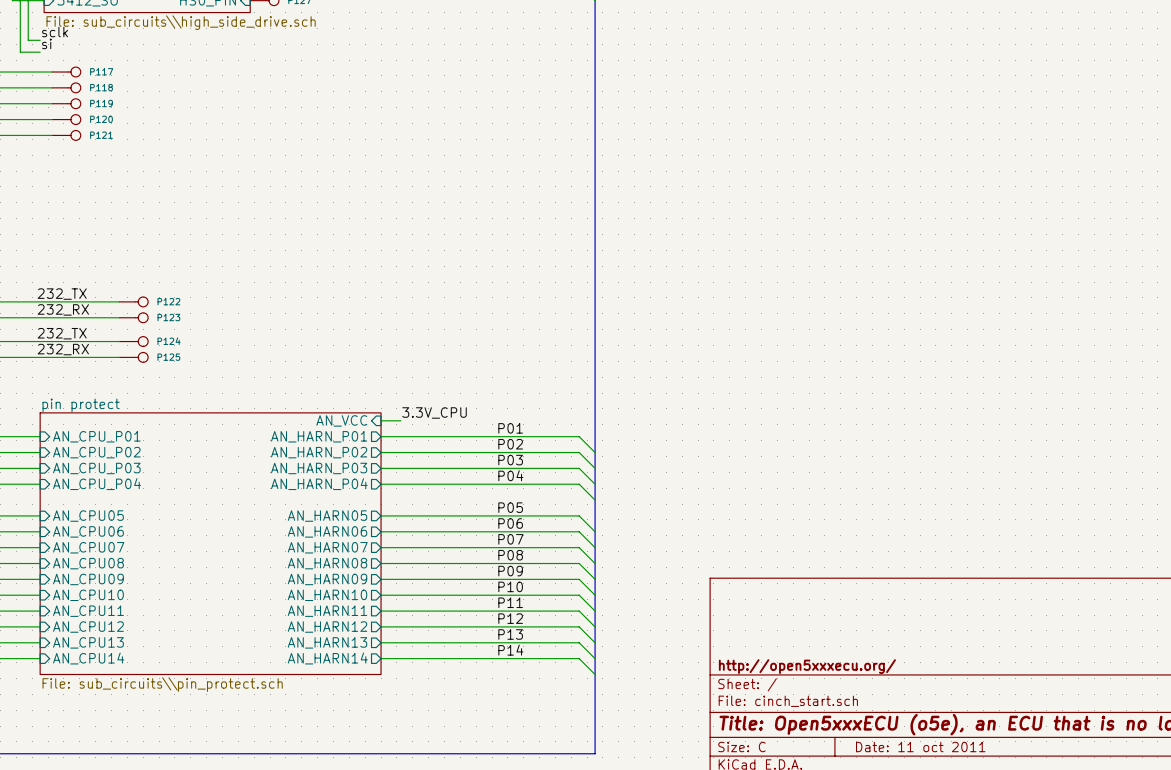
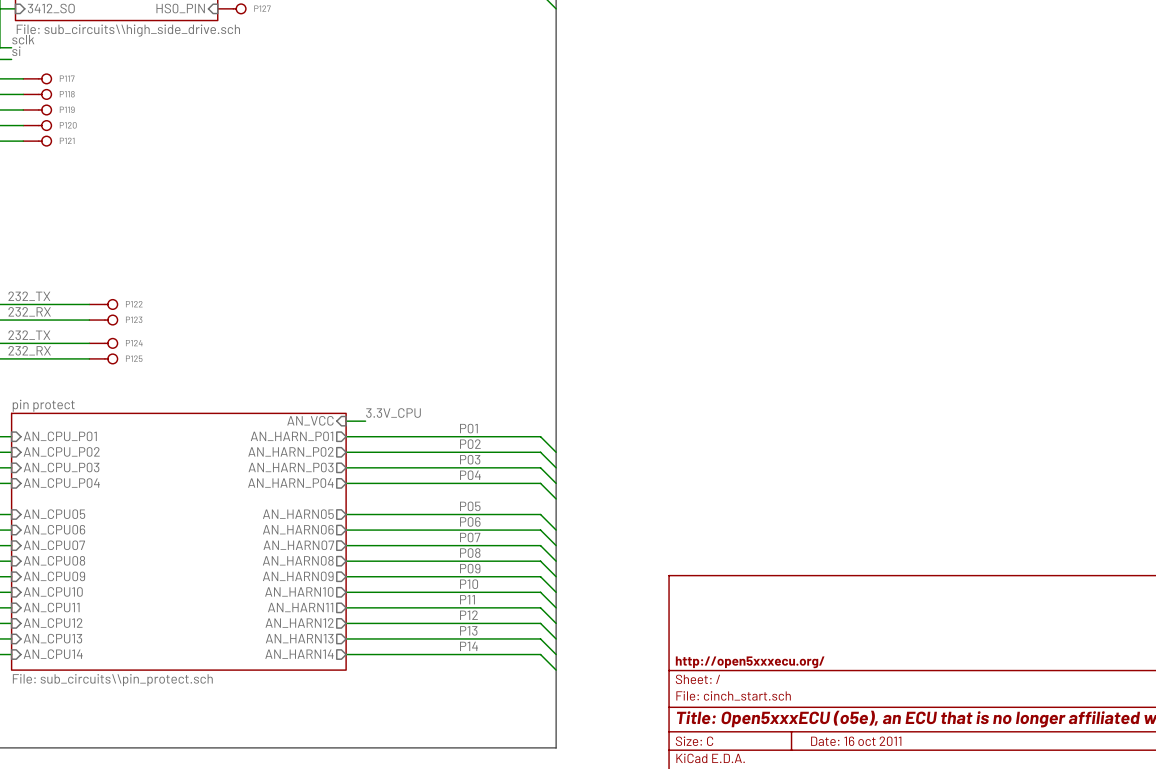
title block: Date: 11 oct 2011 (920, 747) -> Date: 16 oct 2011 (856, 741)

